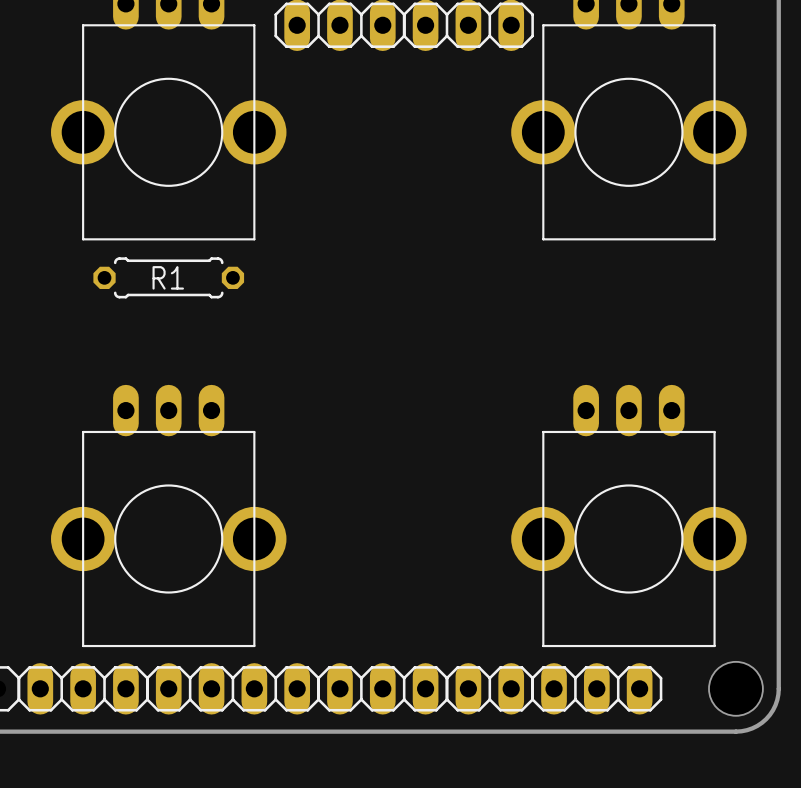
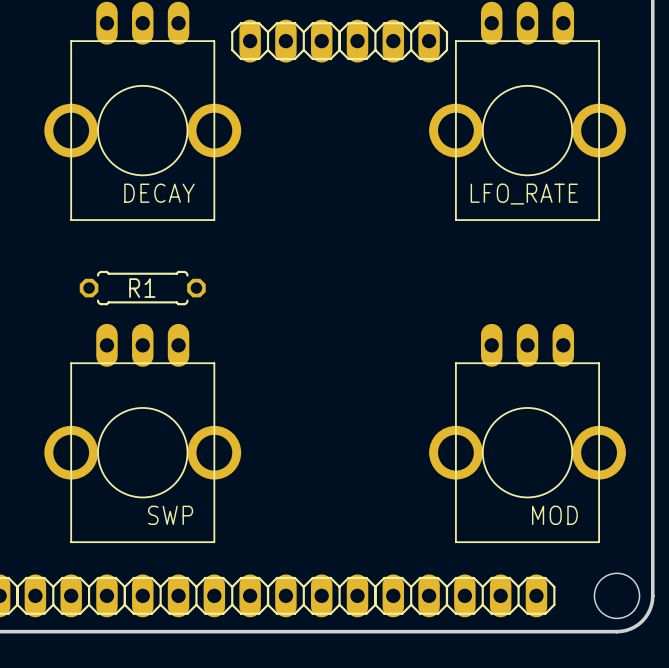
DECAY name: none -> DECAY (159, 193)
LFO_RATE name: none -> LFO_RATE (524, 194)
R1 position: (168, 277) -> (142, 288)
SWP: none -> (142, 433)
MOD: none -> (527, 433)
part: (168, 515) -> none
part: (628, 515) -> none

